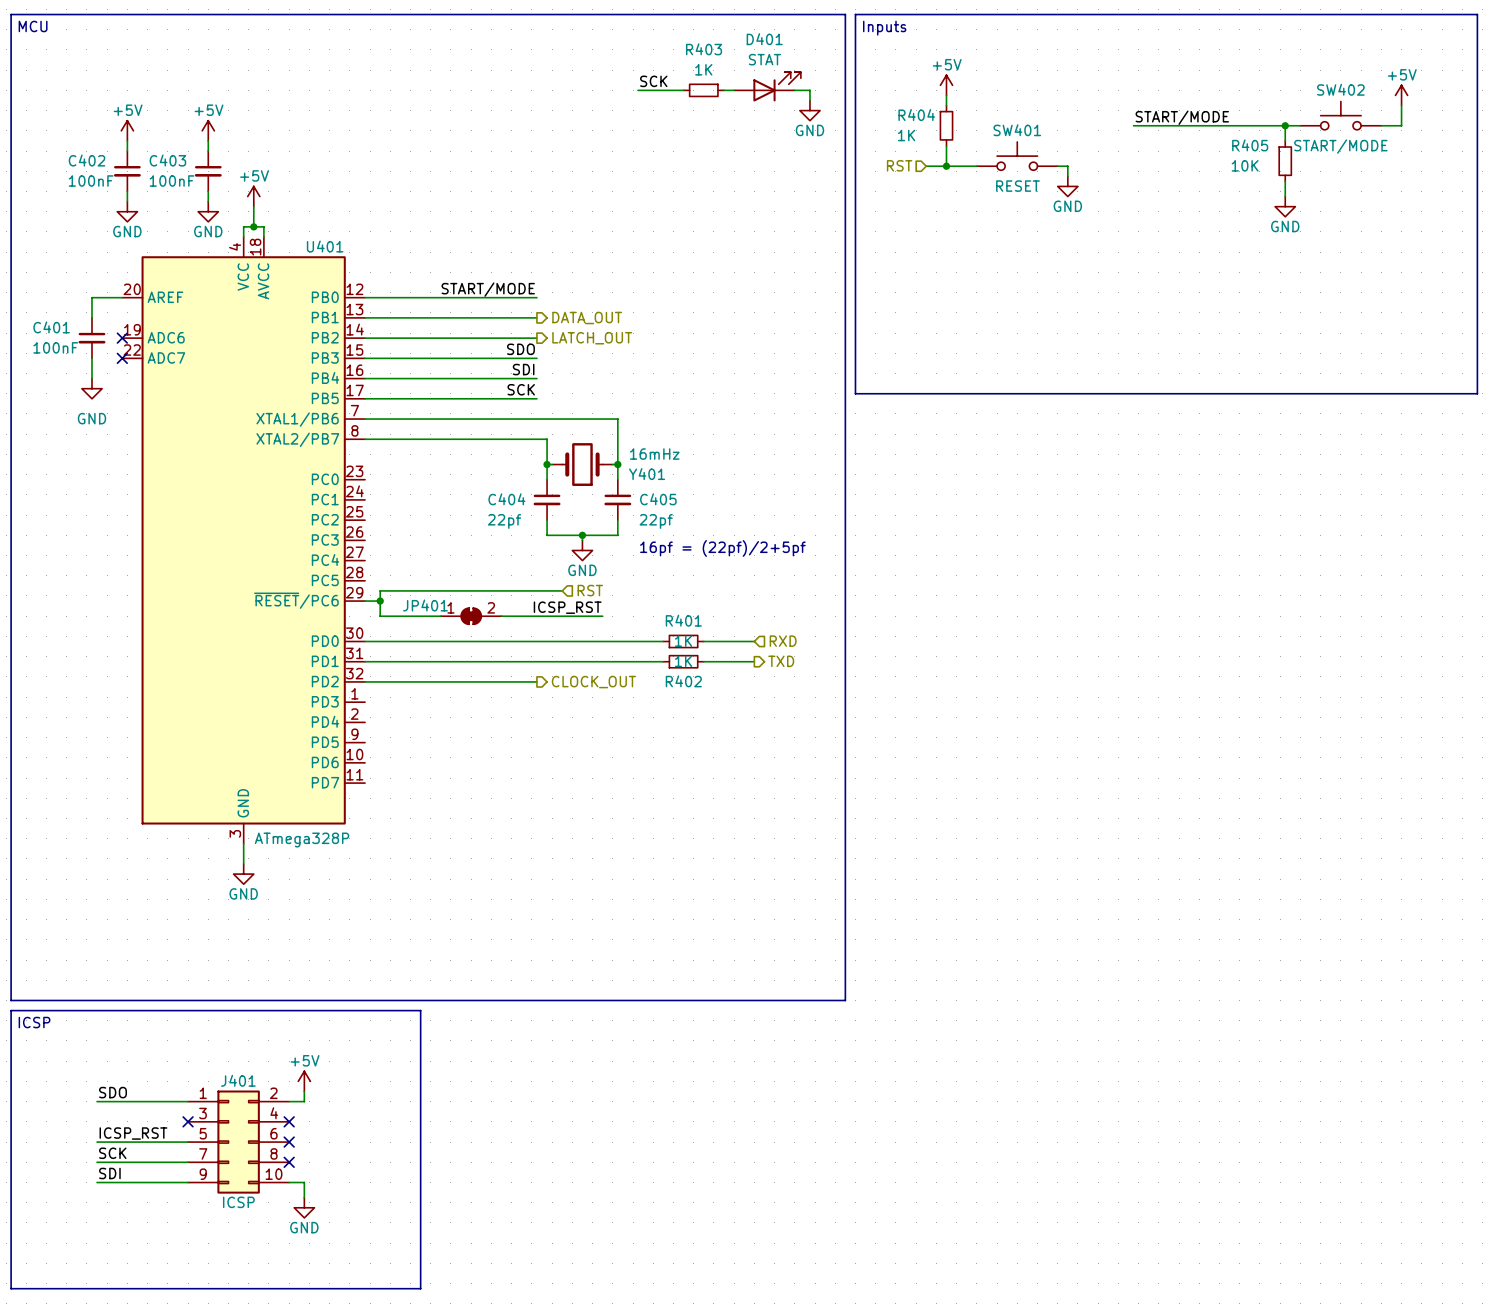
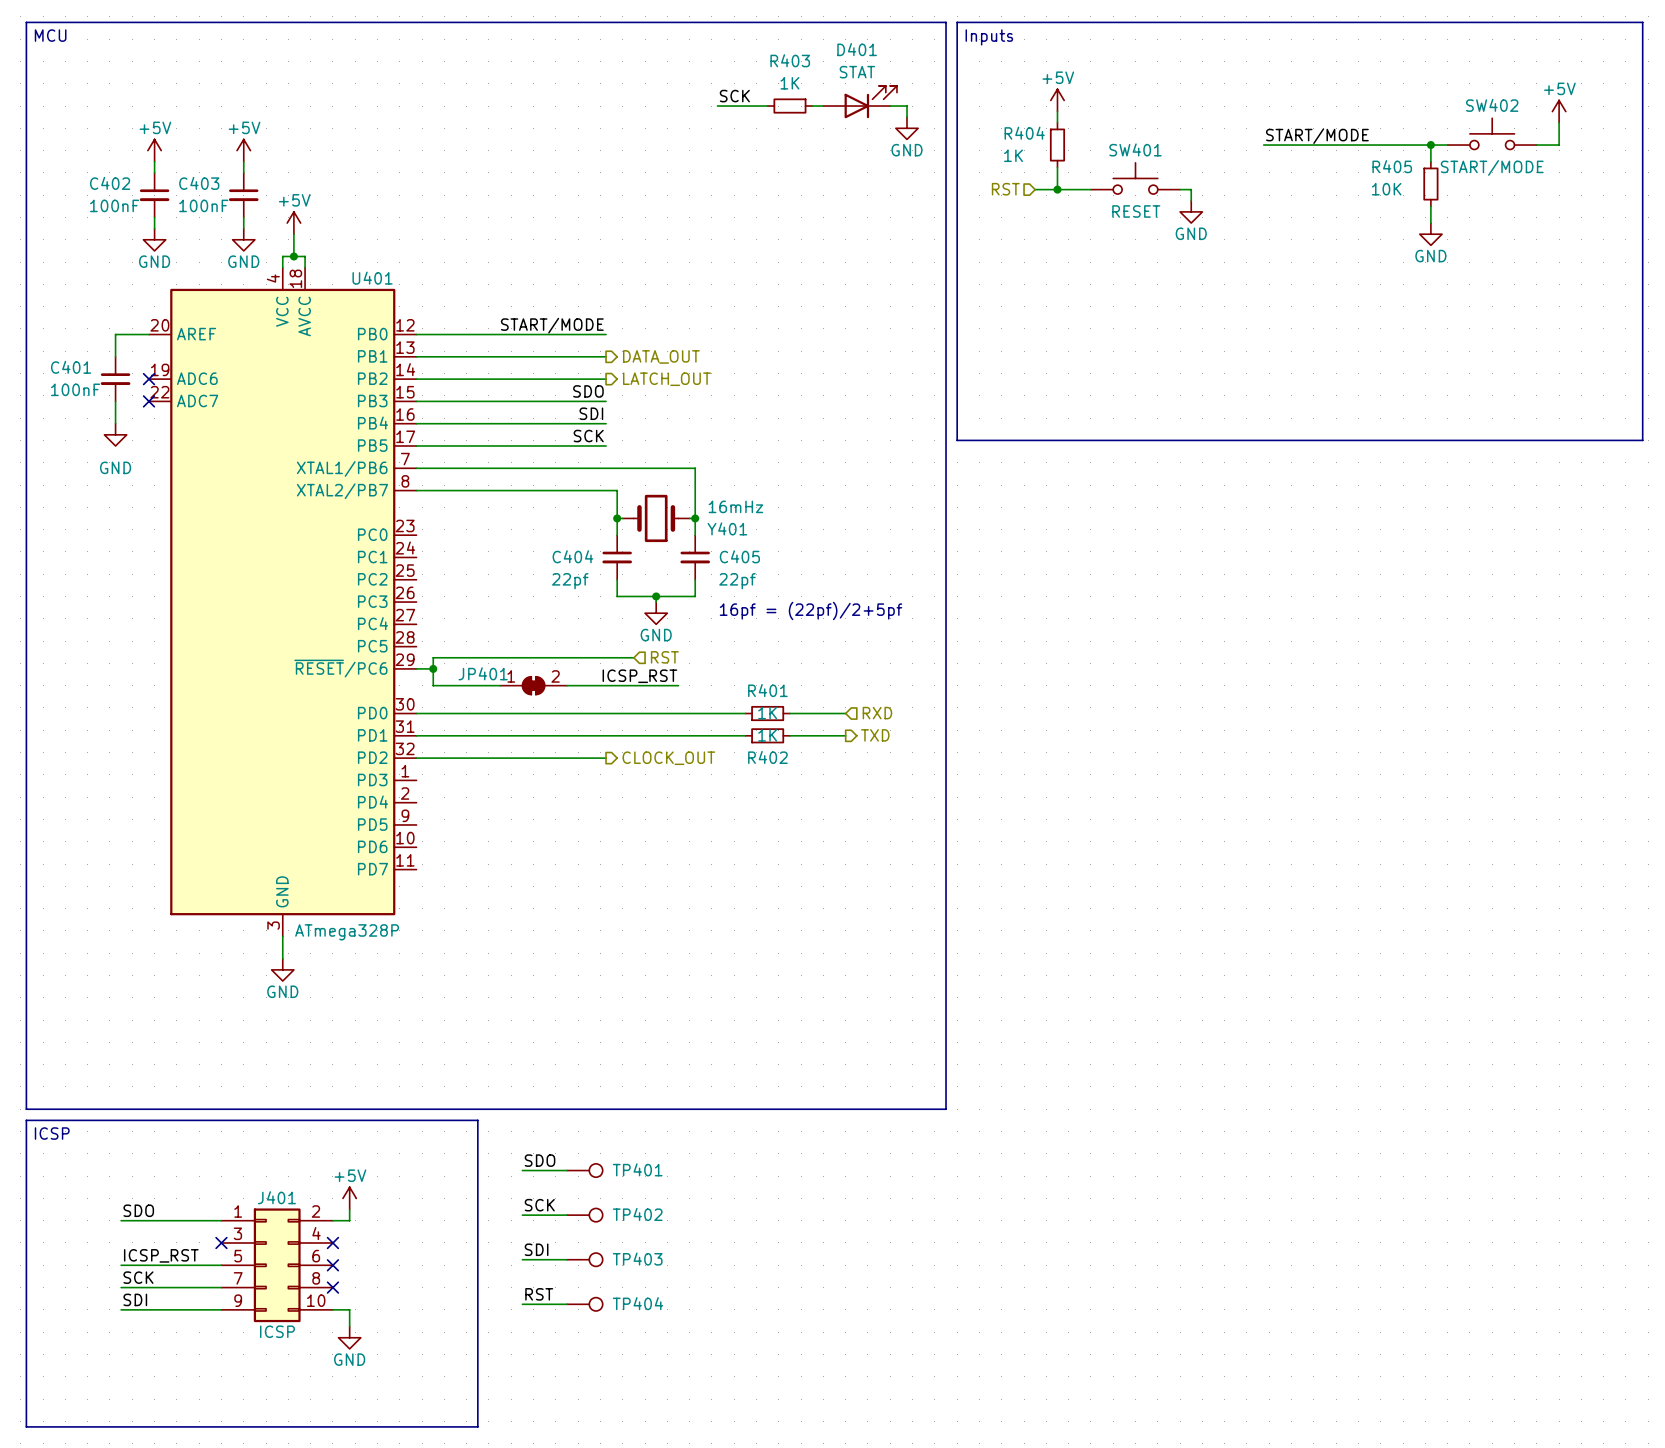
label: none -> SDO (540, 1160)
wire: none -> (522, 1170) (567, 1170)
TP401: none -> (584, 1170)
label: none -> SCK (539, 1205)
wire: none -> (522, 1215) (567, 1215)
TP402: none -> (584, 1215)
label: none -> SDI (536, 1249)
wire: none -> (522, 1259) (567, 1259)
TP403: none -> (584, 1259)
label: none -> RST (539, 1294)
wire: none -> (522, 1304) (567, 1304)
TP404: none -> (584, 1304)

